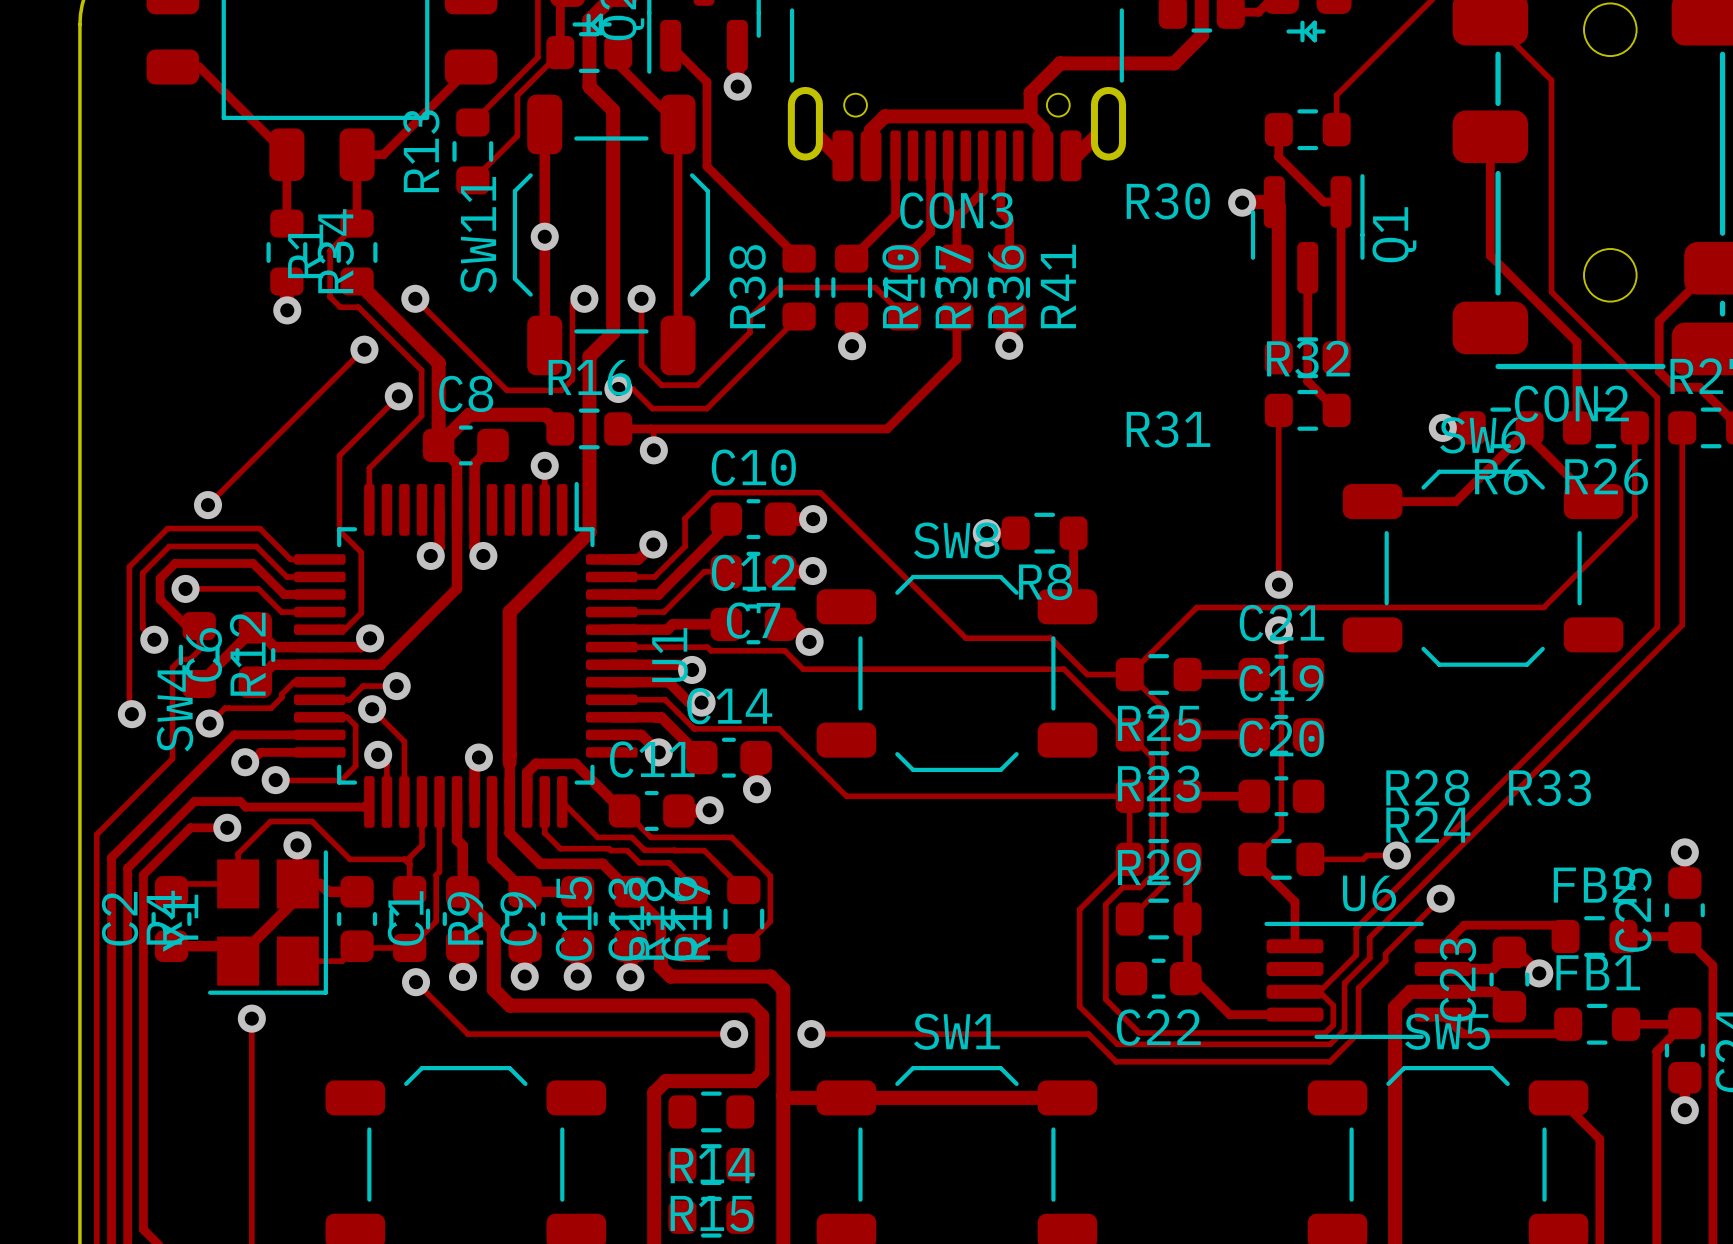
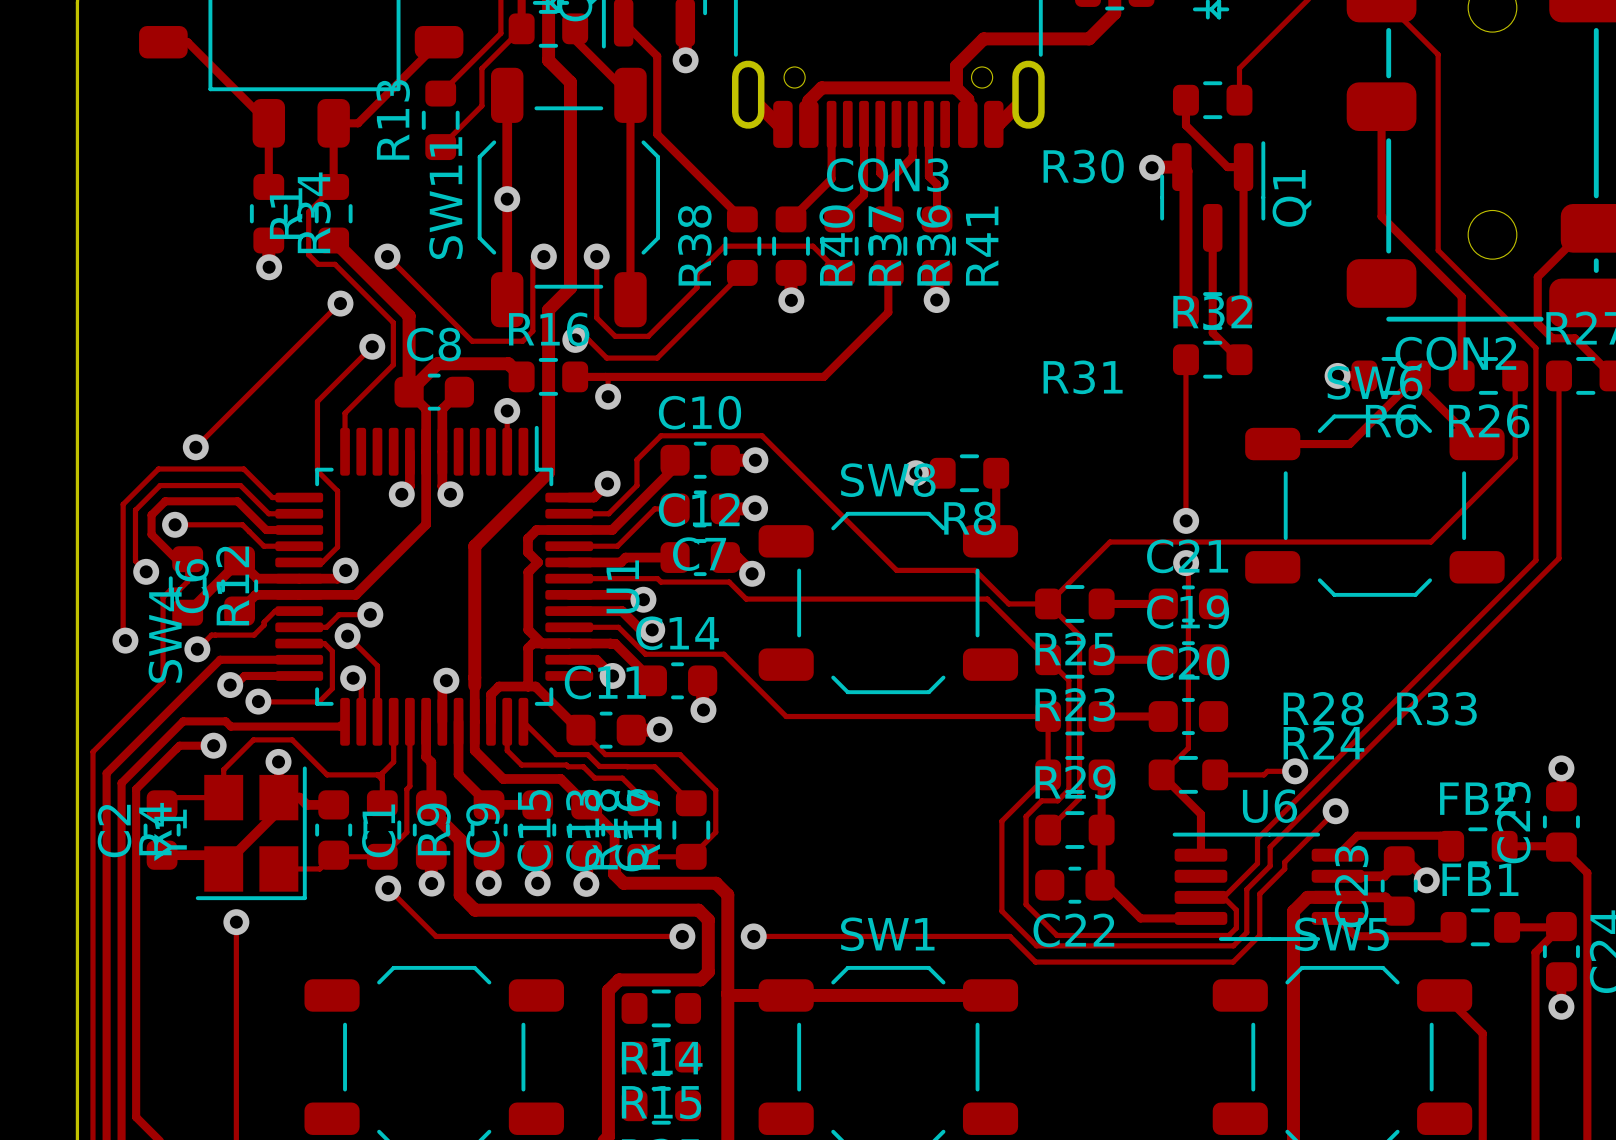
track: none -> (569, 530) (536, 530) (527, 538) (527, 552) (538, 562) (528, 572) (528, 629) (541, 643)
track: none -> (569, 643) (532, 643) (528, 648) (528, 686)

